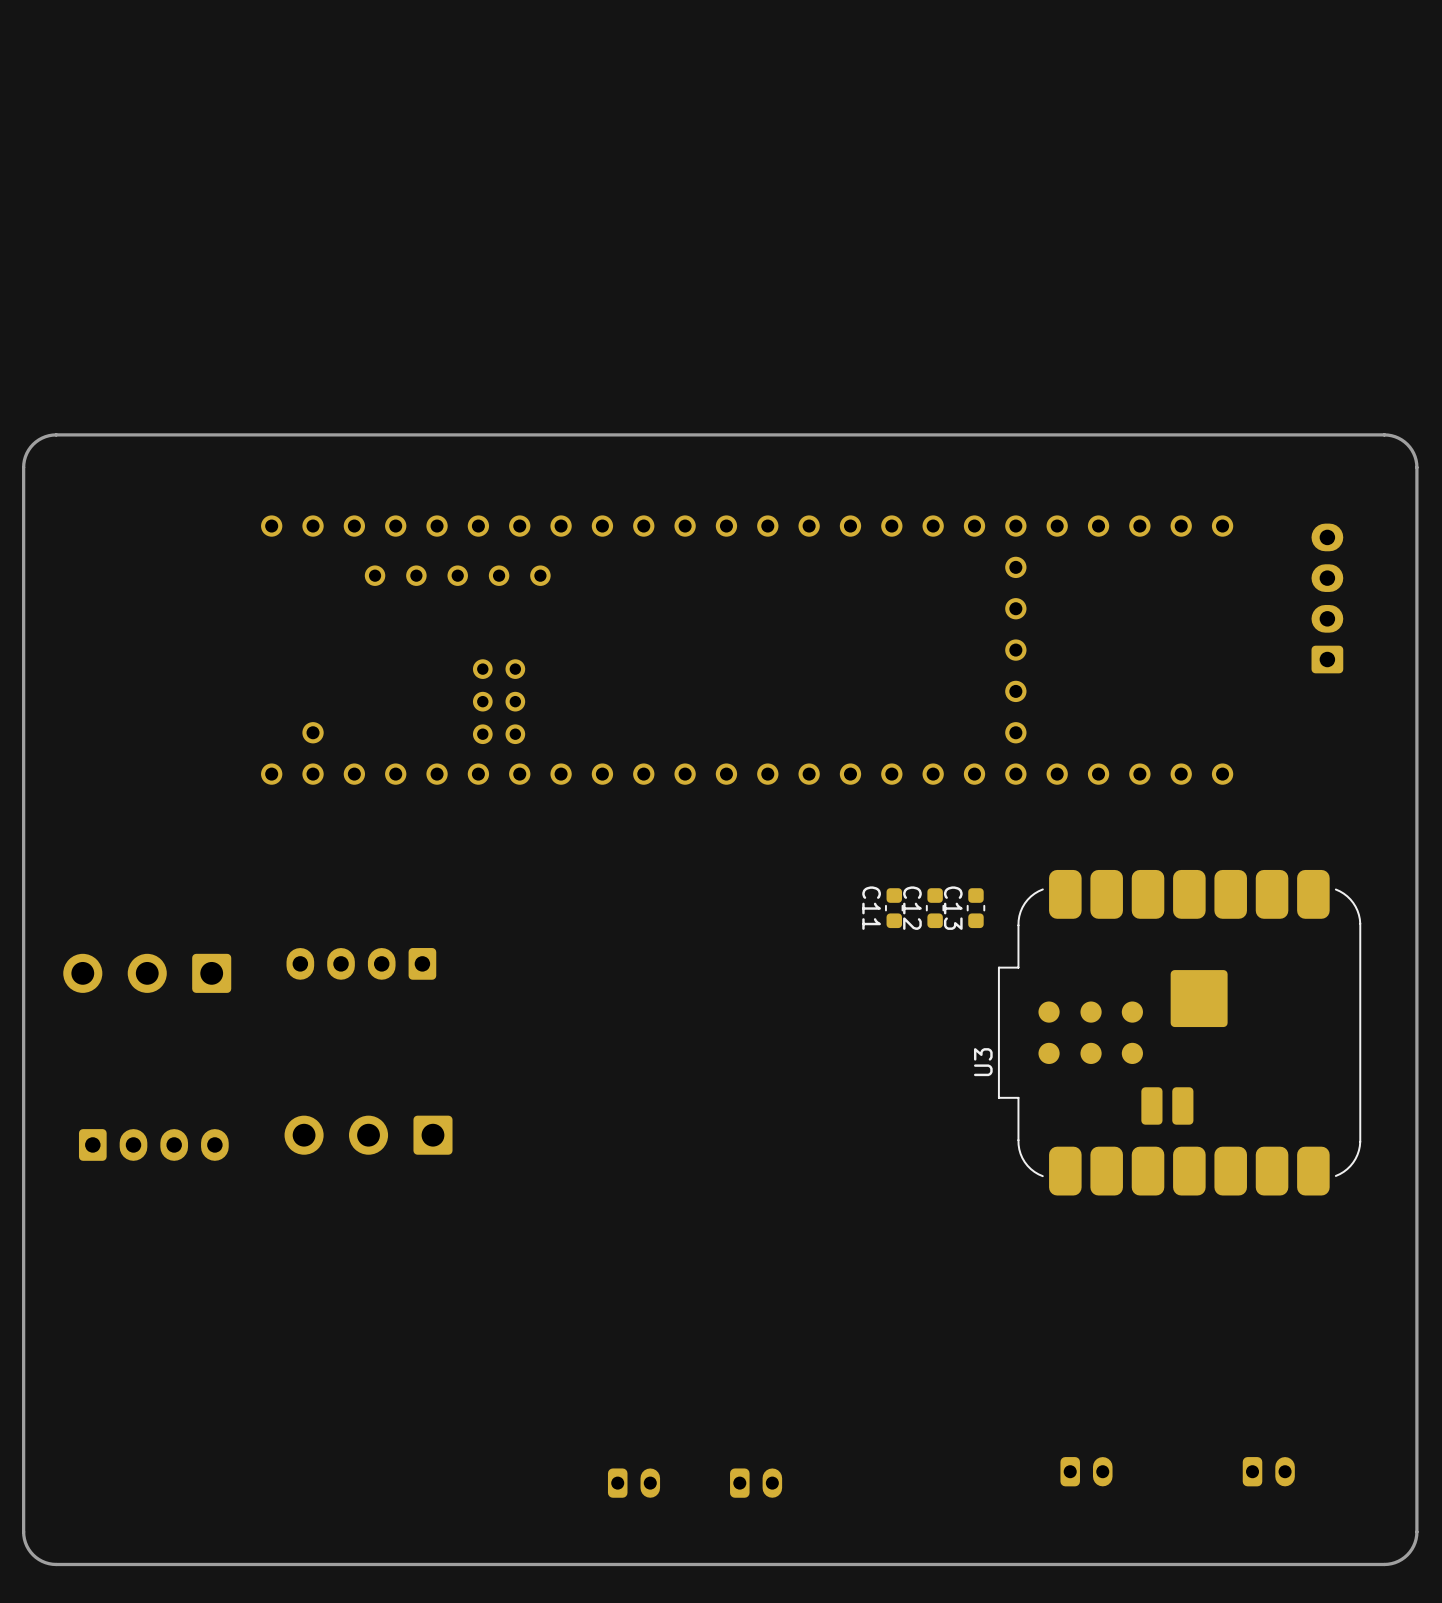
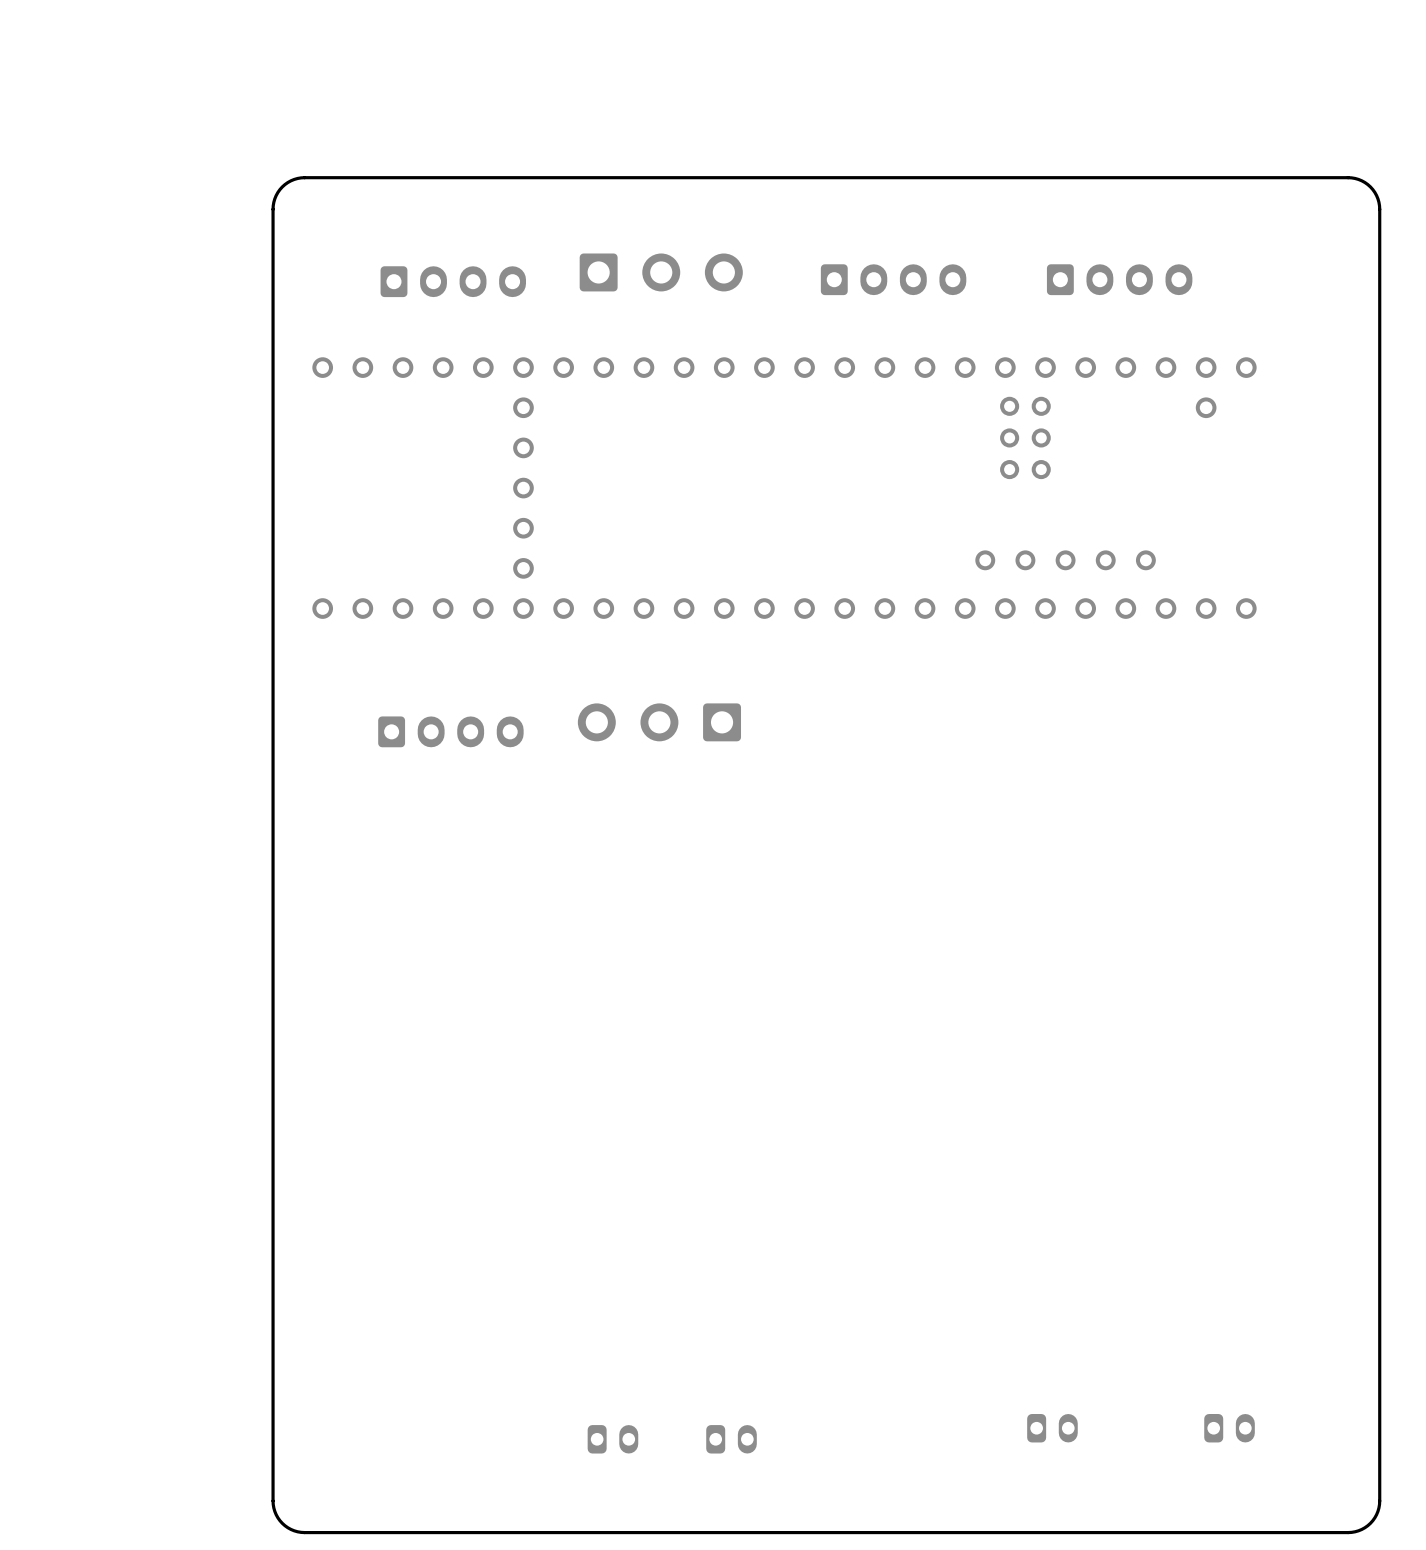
part: none -> (661, 272)
part: none -> (893, 279)
part: none -> (1119, 279)
part: none -> (453, 281)
board edge: (1384, 434) (56, 434) (45, 436) (35, 441) (26, 453) (23, 467) (23, 1531) (25, 1542) (30, 1552) (42, 1561) (56, 1564) (1384, 1564) (1395, 1562) (1404, 1557) (1413, 1546) (1416, 1531) (1416, 467) (1415, 456) (1407, 444) (1395, 436) (1384, 434) -> (1348, 177) (1358, 179) (1370, 186) (1376, 195) (1379, 209) (1379, 1500) (1377, 1511) (1372, 1520) (1361, 1529) (1348, 1532) (304, 1532) (294, 1530) (284, 1525) (276, 1514) (273, 1500) (273, 209) (274, 198) (279, 189) (290, 180) (304, 177) (1348, 177)
part: (1327, 598) -> none
part rotation: 0° (747, 650) -> 180° (784, 488)
part: none -> (659, 722)
C11: (894, 908) -> none
C12: (935, 908) -> none
C13: (975, 908) -> none
part rotation: 0° (361, 963) -> 180° (450, 731)
part position: (361, 963) -> (450, 731)
part: (147, 973) -> none
U3: (1179, 1032) -> none
part: (368, 1135) -> none
part: (153, 1144) -> none

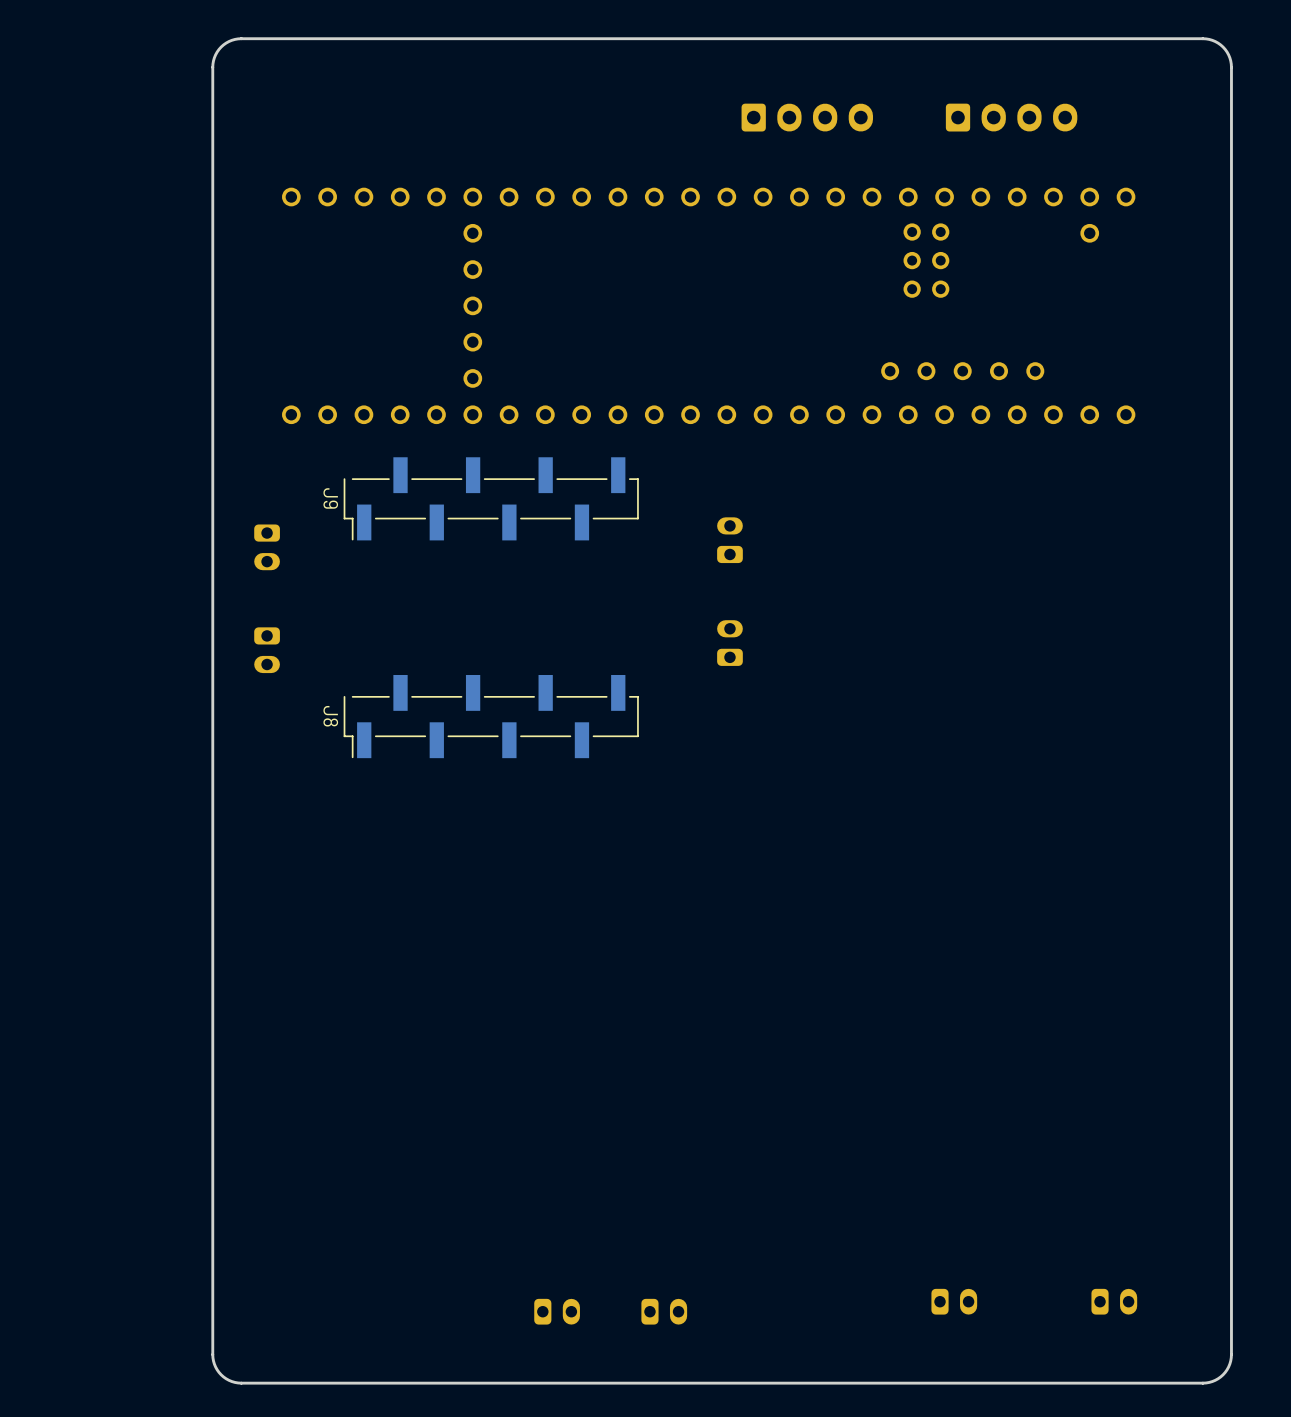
part: none -> (807, 117)
part: none -> (1011, 117)
board edge: (1348, 177) (304, 177) (290, 180) (279, 189) (274, 198) (273, 209) (273, 1500) (276, 1514) (284, 1525) (294, 1530) (304, 1532) (1348, 1532) (1361, 1529) (1372, 1520) (1377, 1511) (1379, 1500) (1379, 209) (1376, 195) (1370, 186) (1358, 179) (1348, 177) -> (1202, 38) (1212, 40) (1223, 47) (1228, 54) (1231, 67) (1231, 1354) (1229, 1364) (1225, 1372) (1215, 1380) (1202, 1383) (241, 1383) (231, 1381) (223, 1376) (215, 1366) (212, 1354) (212, 67) (214, 57) (219, 49) (228, 41) (241, 38) (1202, 38)
part: (661, 272) -> none
part: (893, 279) -> none
part: (1119, 279) -> none
part: (453, 281) -> none
part position: (784, 488) -> (708, 305)
J9: none -> (491, 498)
part: none -> (729, 540)
part: none -> (267, 547)
part: none -> (729, 643)
part: none -> (267, 650)
part: (659, 722) -> none
part: (450, 731) -> none
J8: none -> (491, 716)

